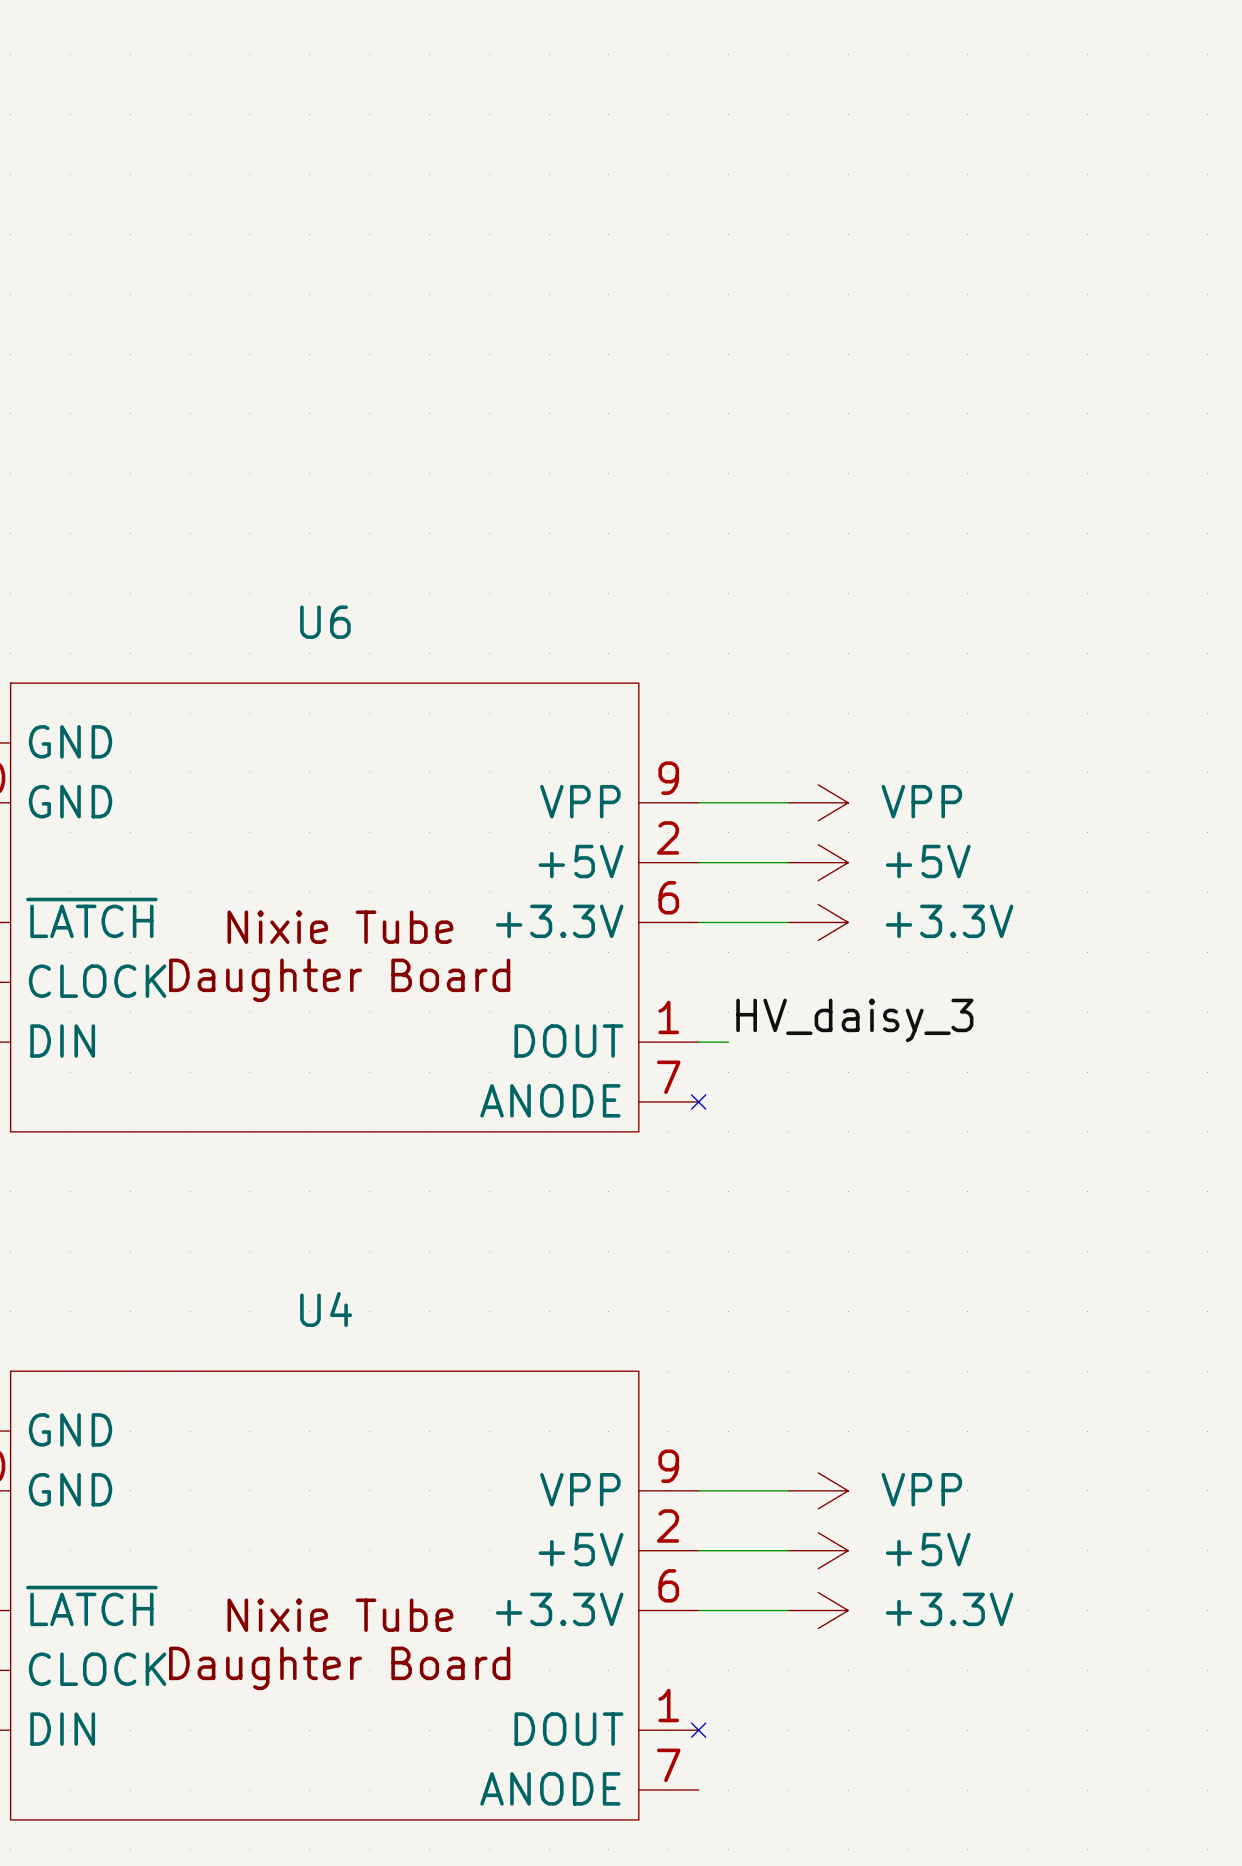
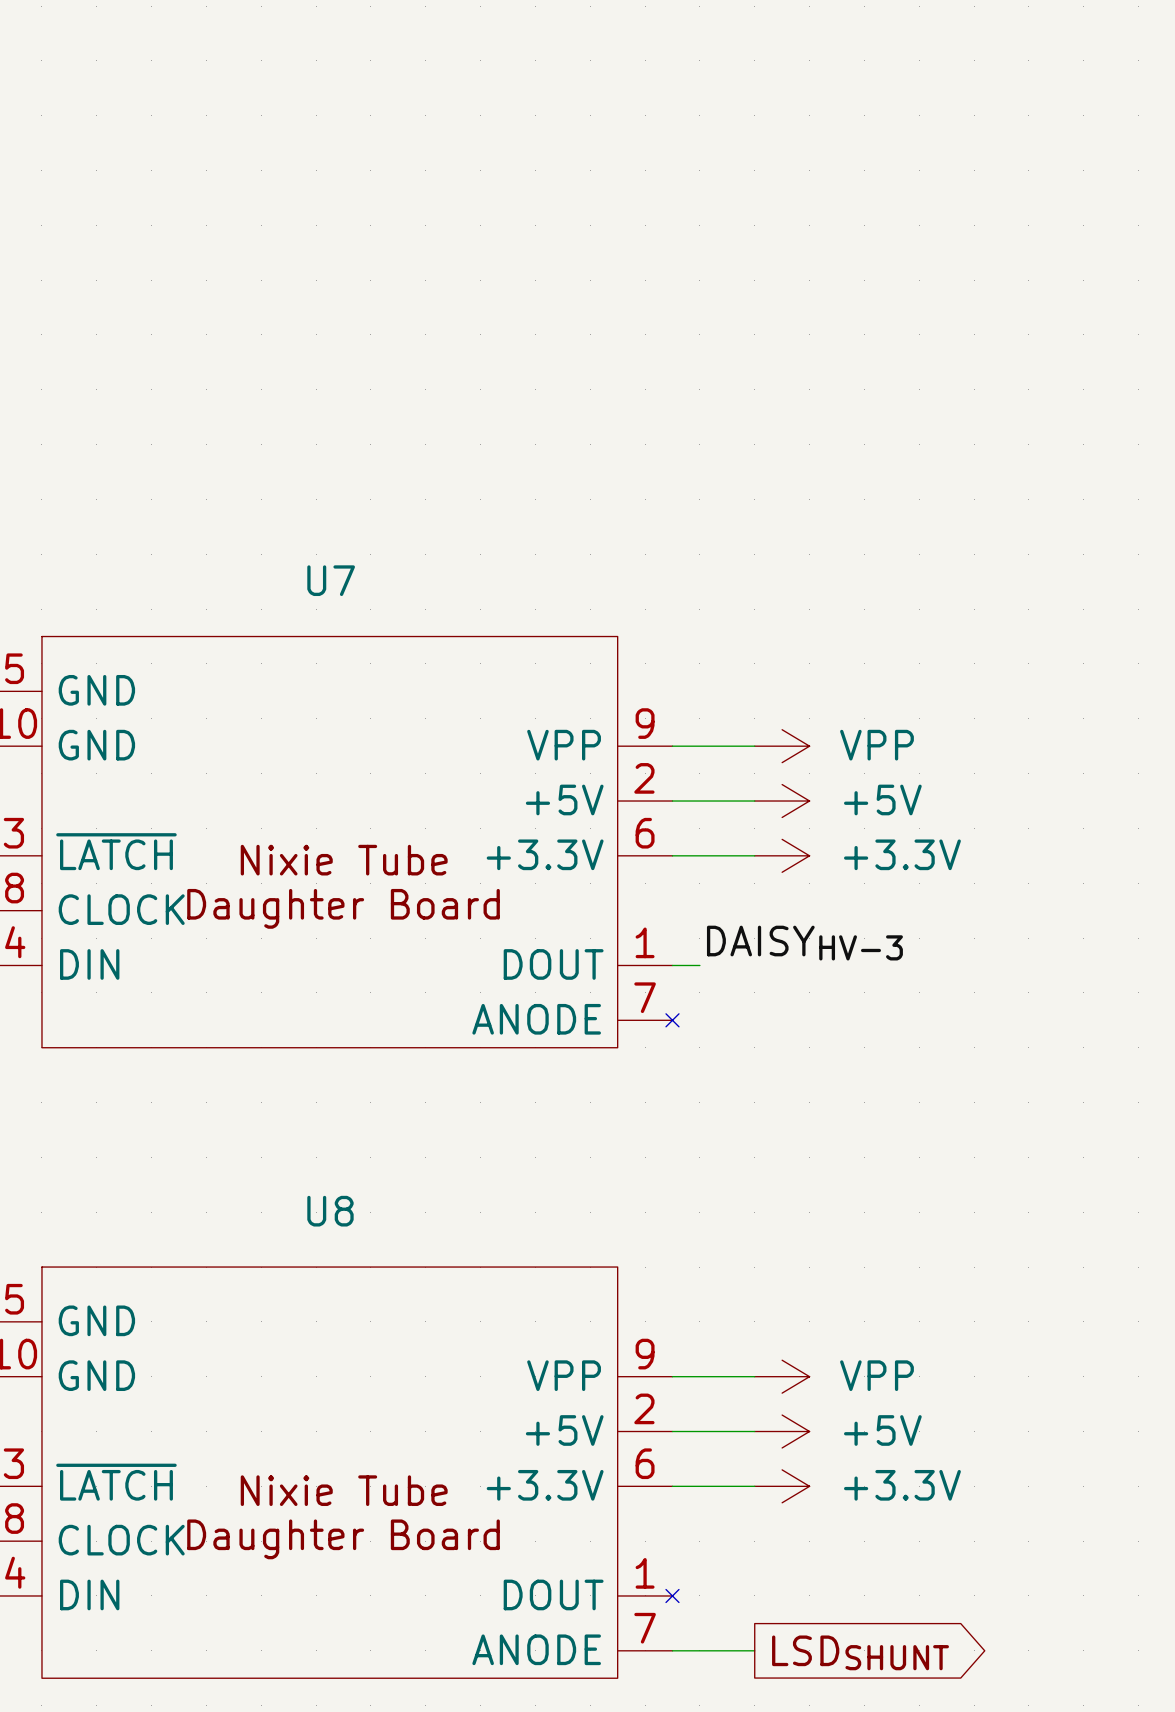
U6 name: U6 (325, 622) -> U7 (331, 580)
label: HV_daisy_3 (854, 1020) -> DAISYHV-3 (804, 943)
U4 name: U4 (326, 1309) -> U8 (330, 1211)
wire: none -> (672, 1650) (754, 1650)
global label: none -> LSDSHUNT (860, 1652)

